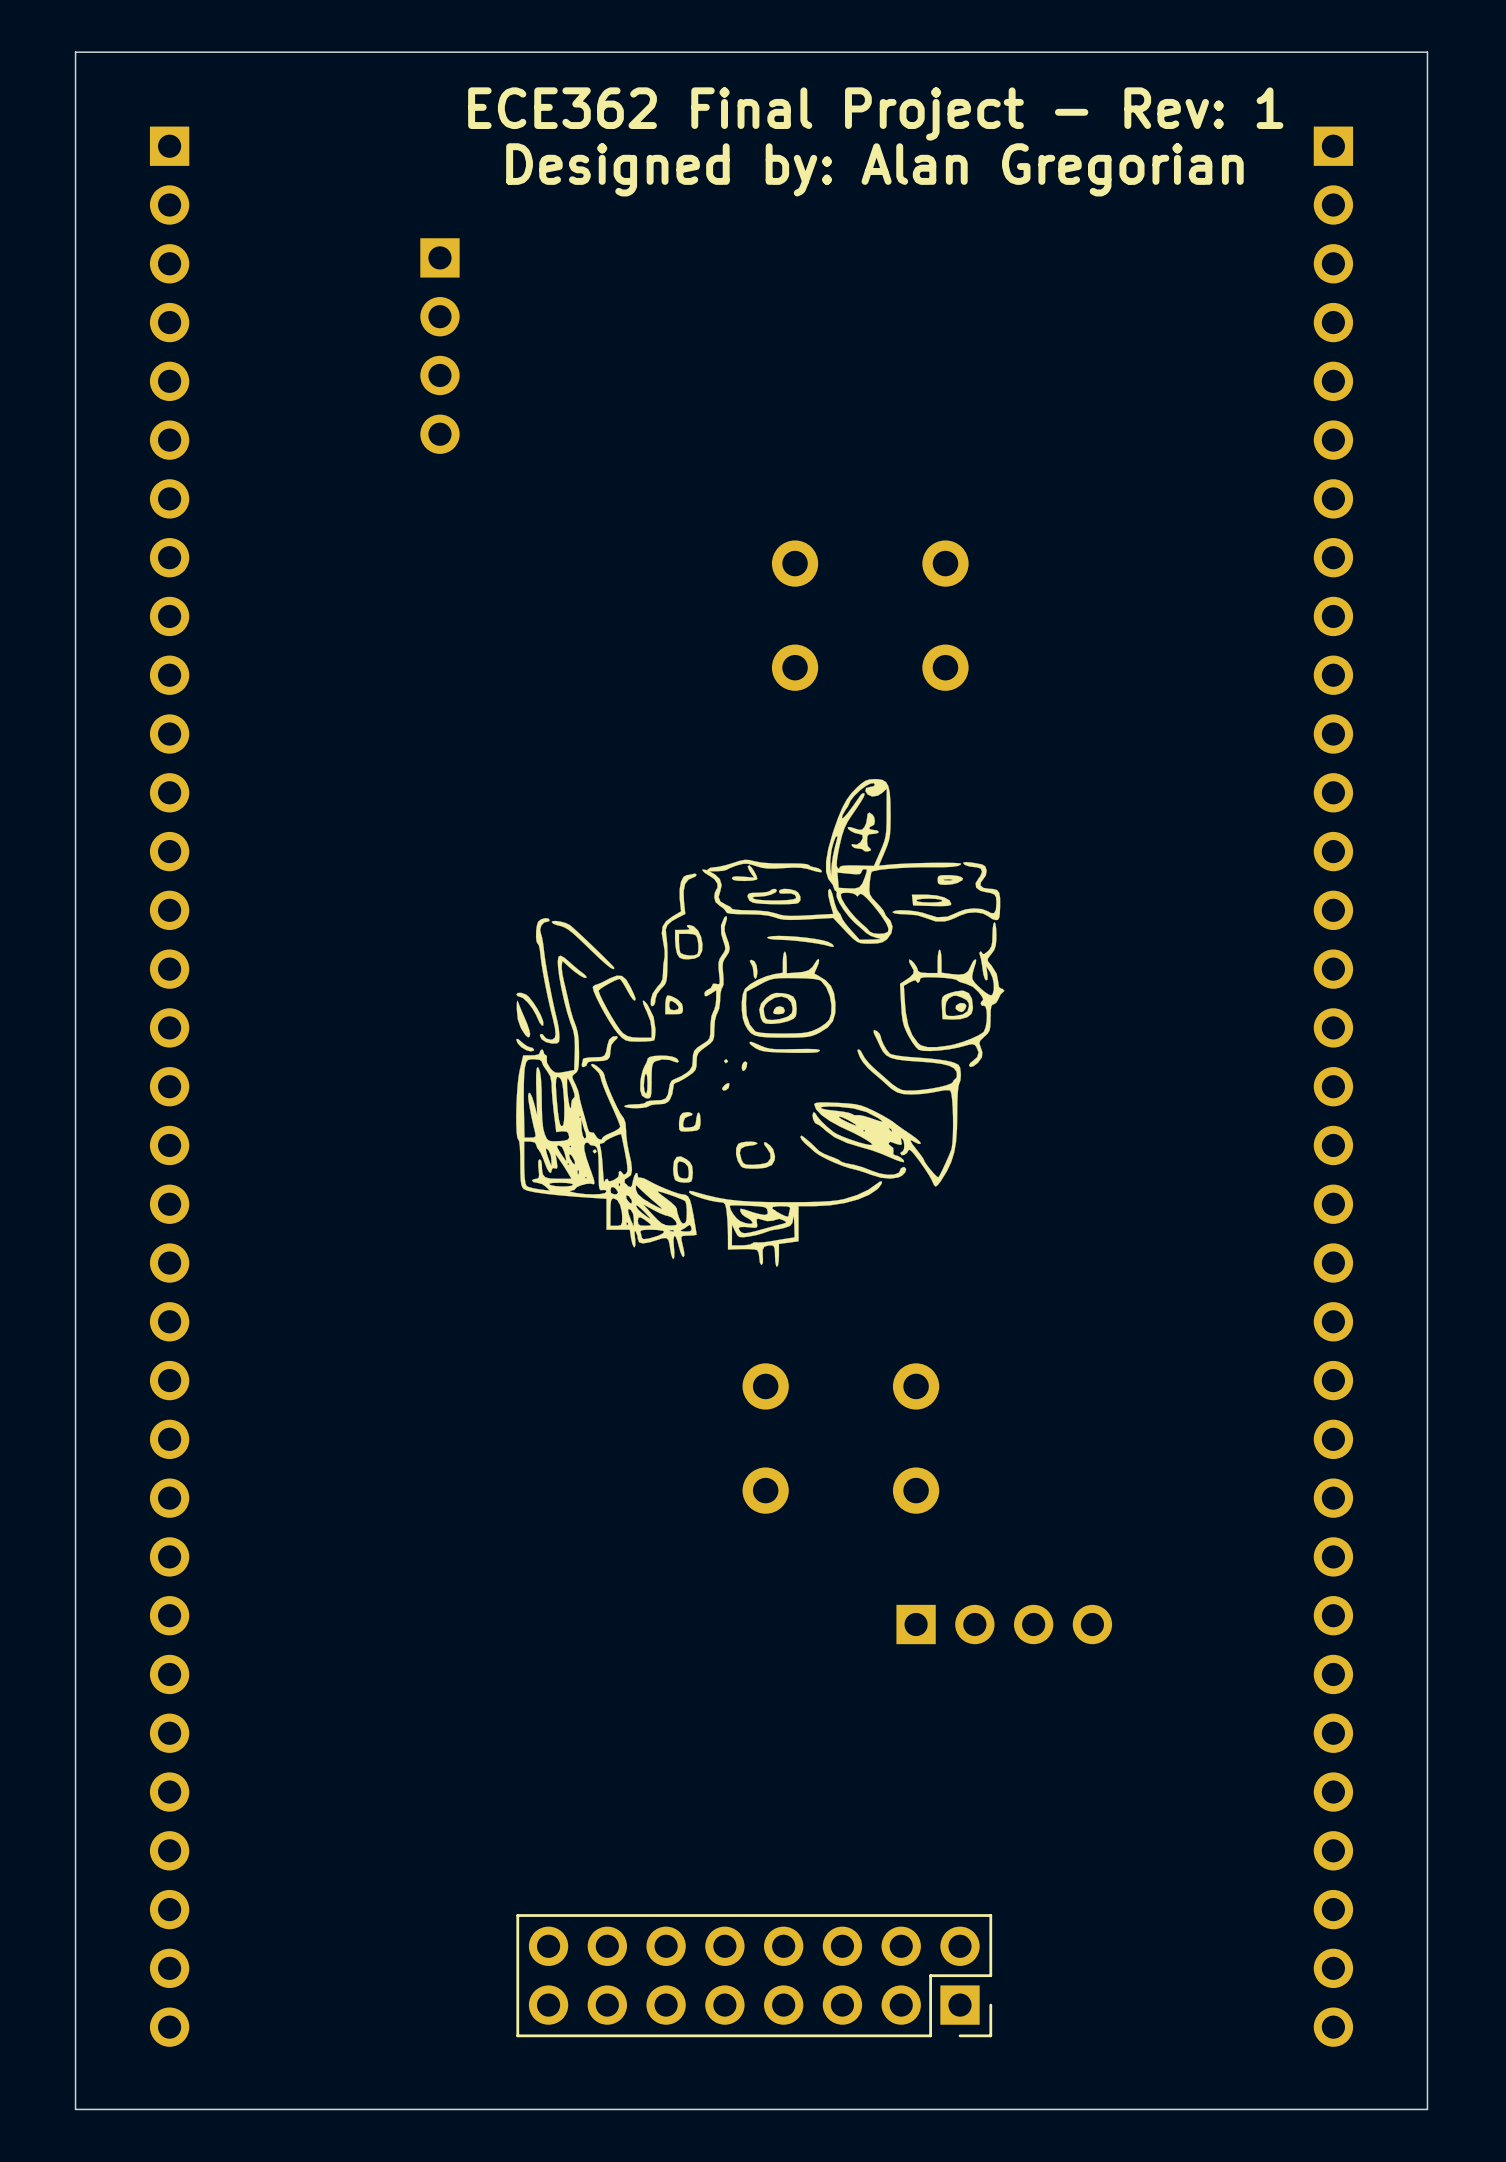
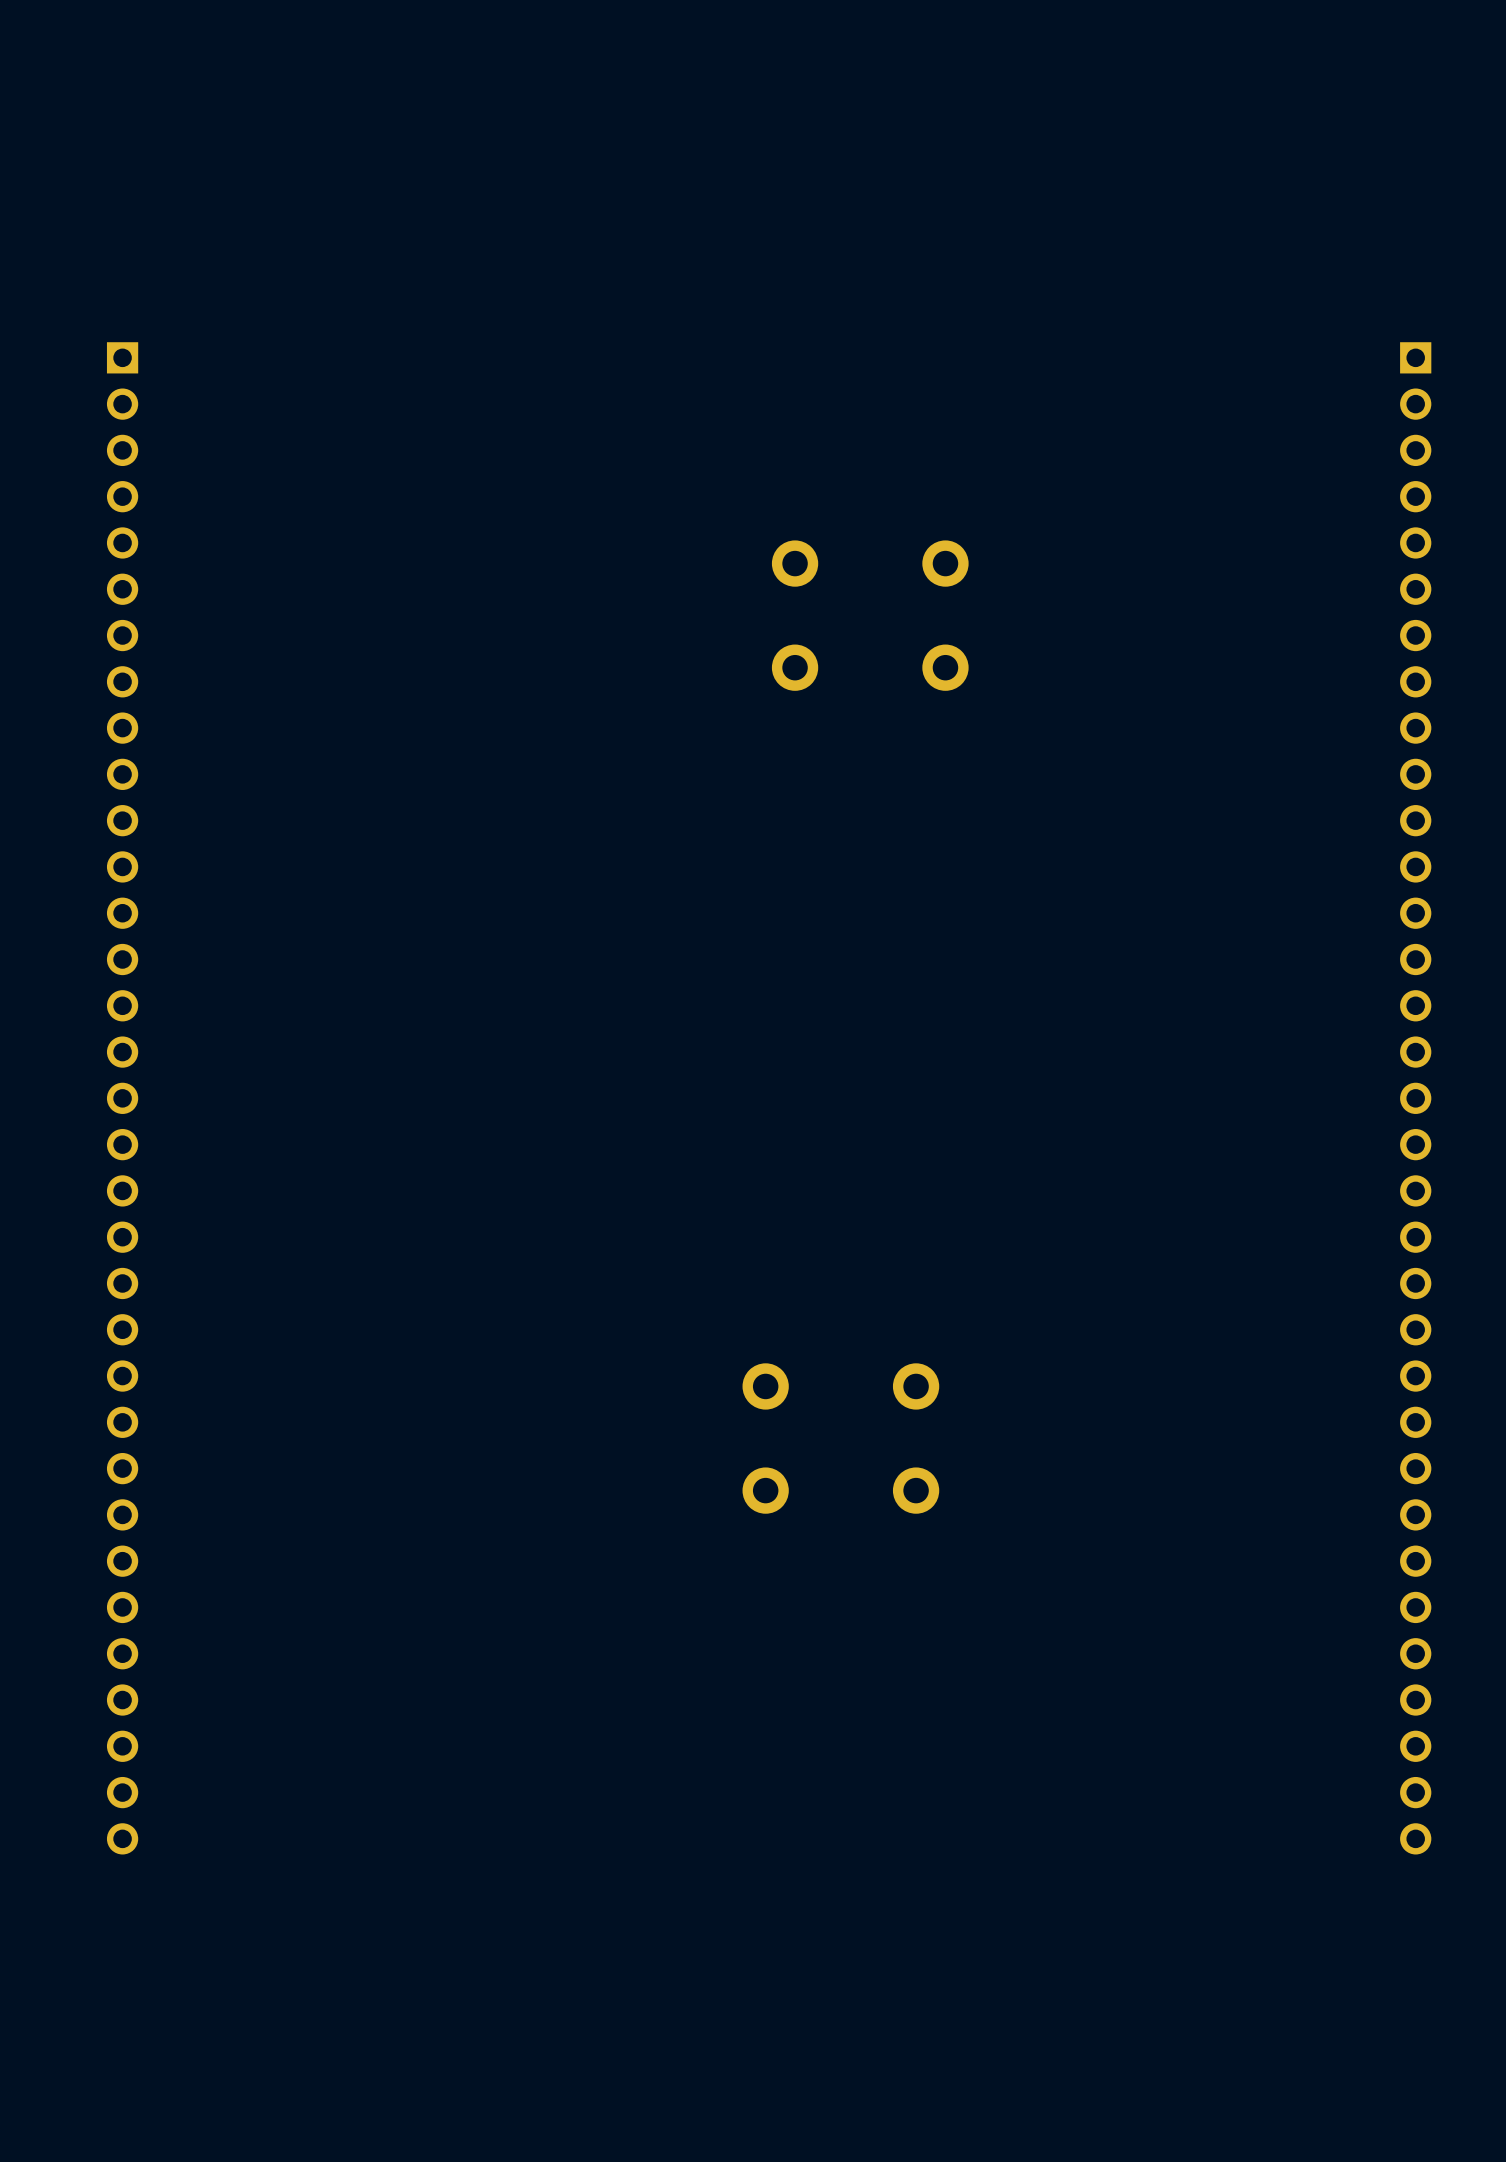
board edge: (1427, 52) (1427, 2109) (75, 2109) (75, 52) (1427, 52) -> none
text: ECE362 Final Project - Rev: 1 (875, 113) -> none
text: Designed by: Alan Gregorian (874, 169) -> none
part: (439, 346) -> none
drawing: [516, 778, 1005, 1268] -> none
part: (169, 1086) -> none
part: (1333, 1086) -> none
part: none -> (122, 1098)
part: none -> (1415, 1098)
part: (1004, 1624) -> none
part: (754, 1975) -> none

